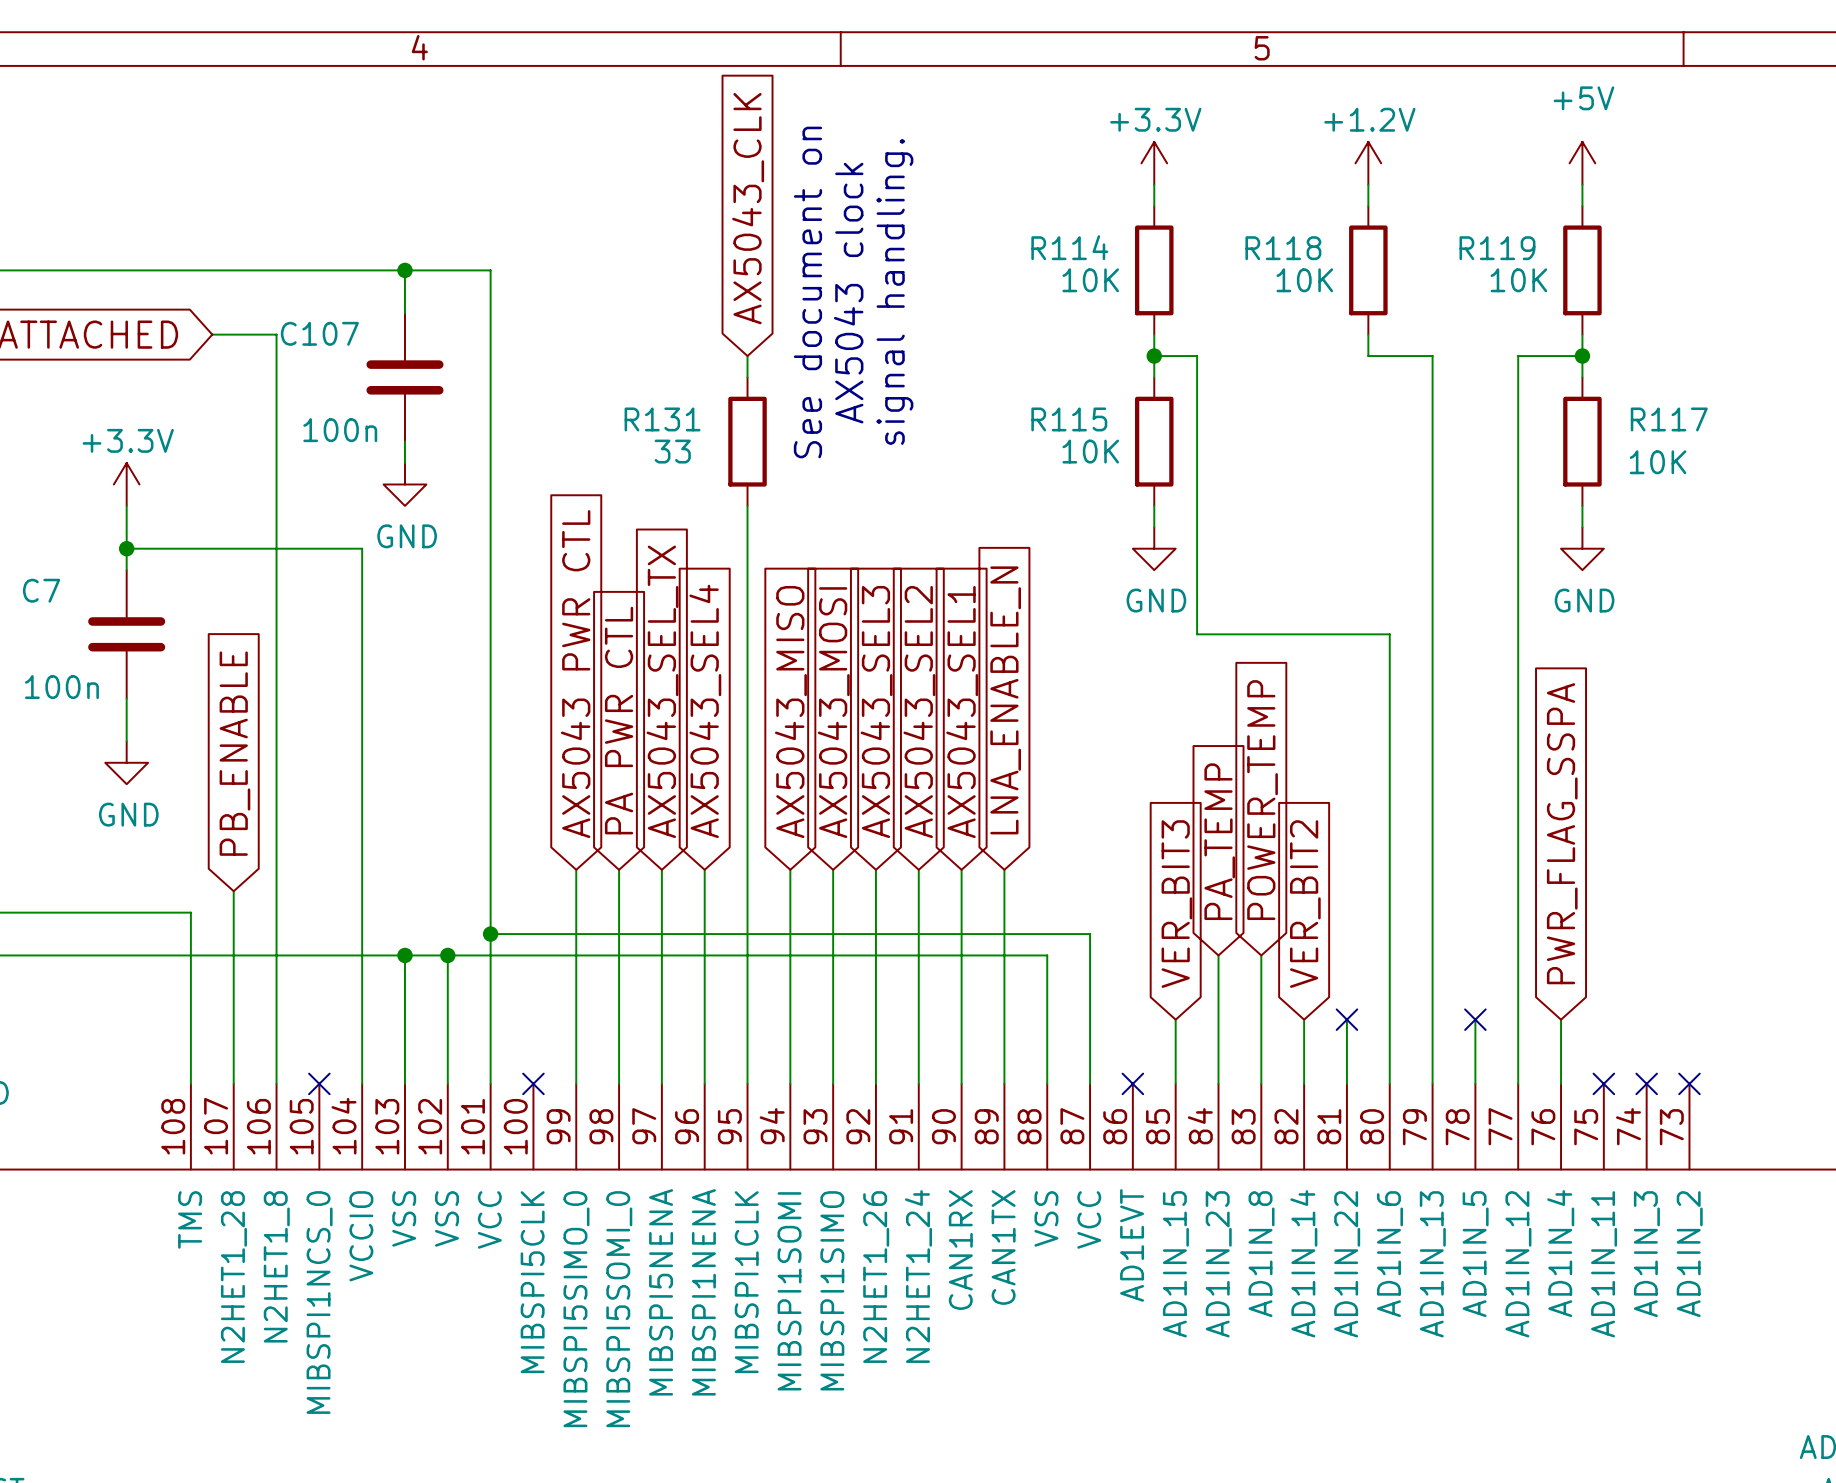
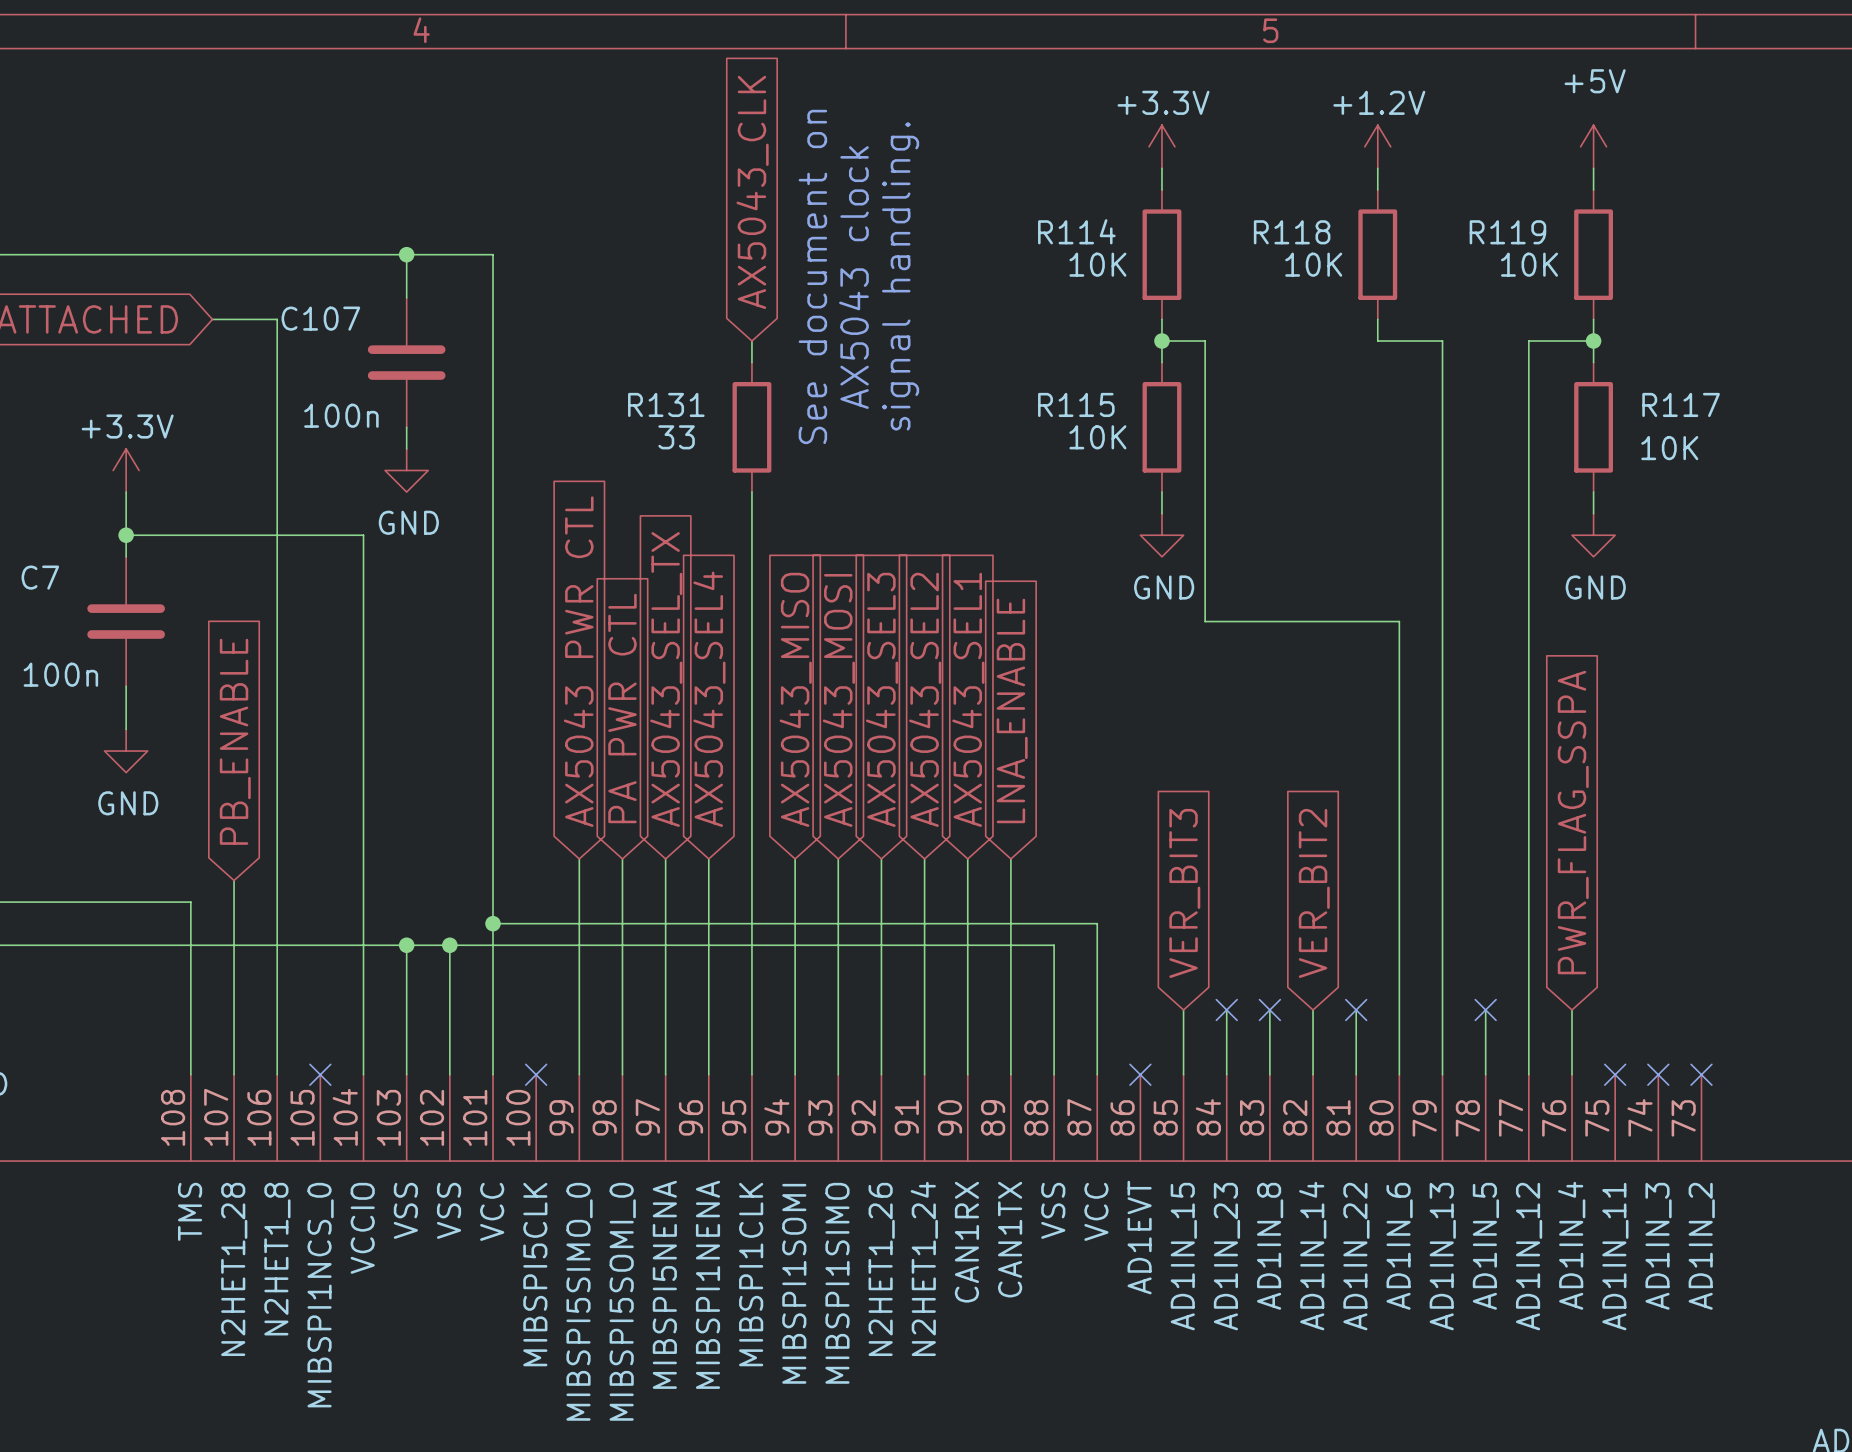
global label: LNA_ENABLE_N (1005, 700) -> LNA_ENABLE (1012, 710)
global label: POWER_TEMP (1262, 800) -> none
global label: PA_TEMP (1219, 841) -> none
wire: (1218, 955) (1218, 1019) -> none
wire: (1261, 955) (1261, 1019) -> none
no-connect mark: none -> (1226, 1009)
no-connect mark: none -> (1269, 1009)

